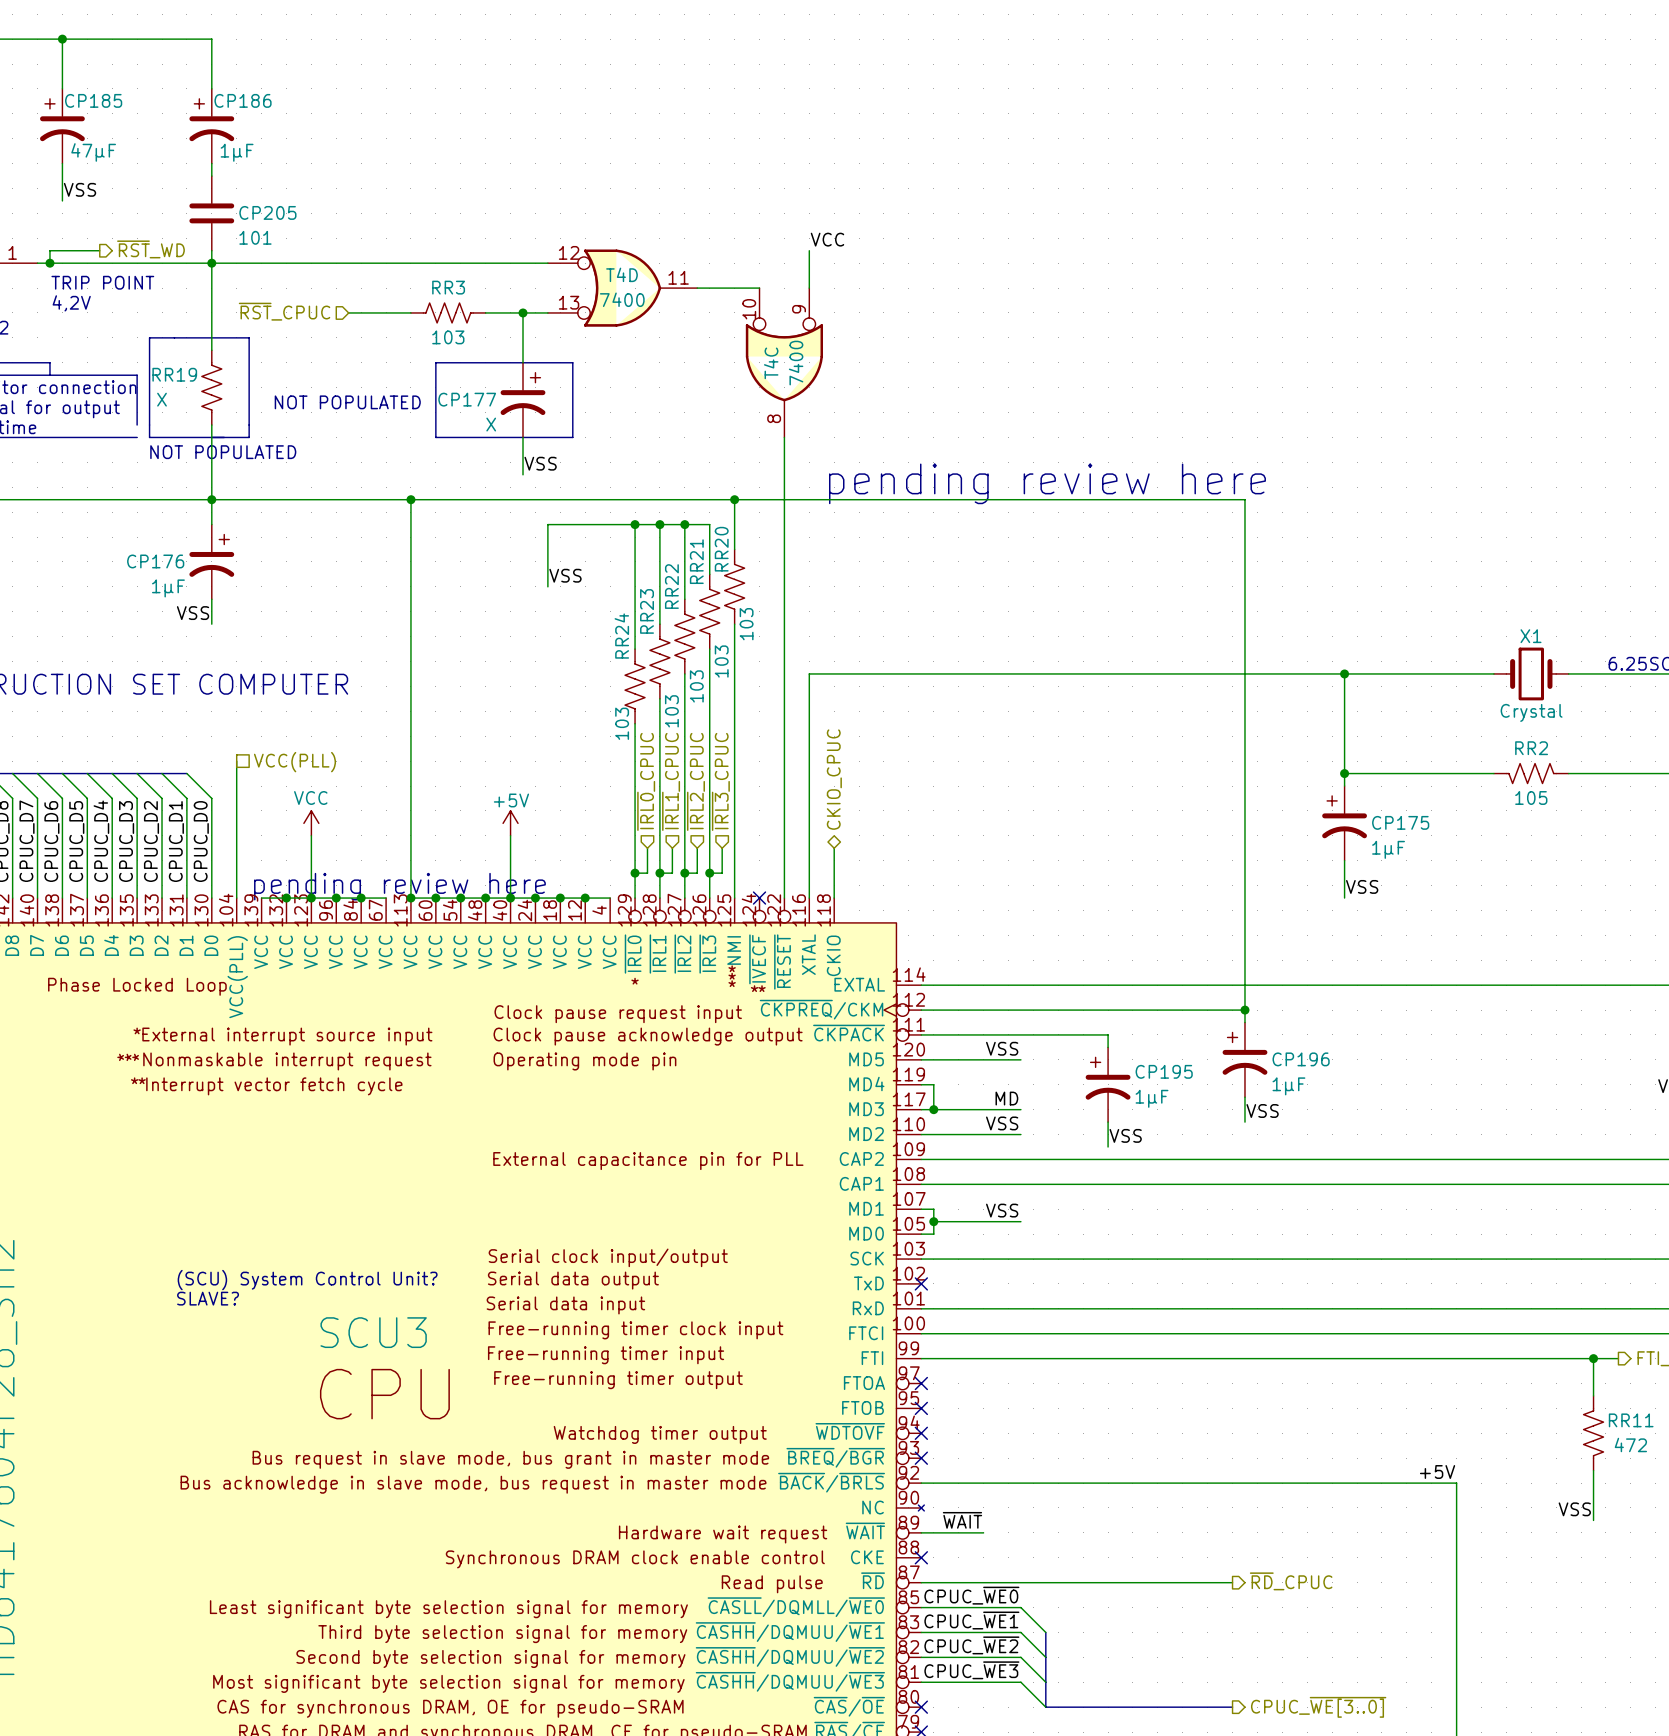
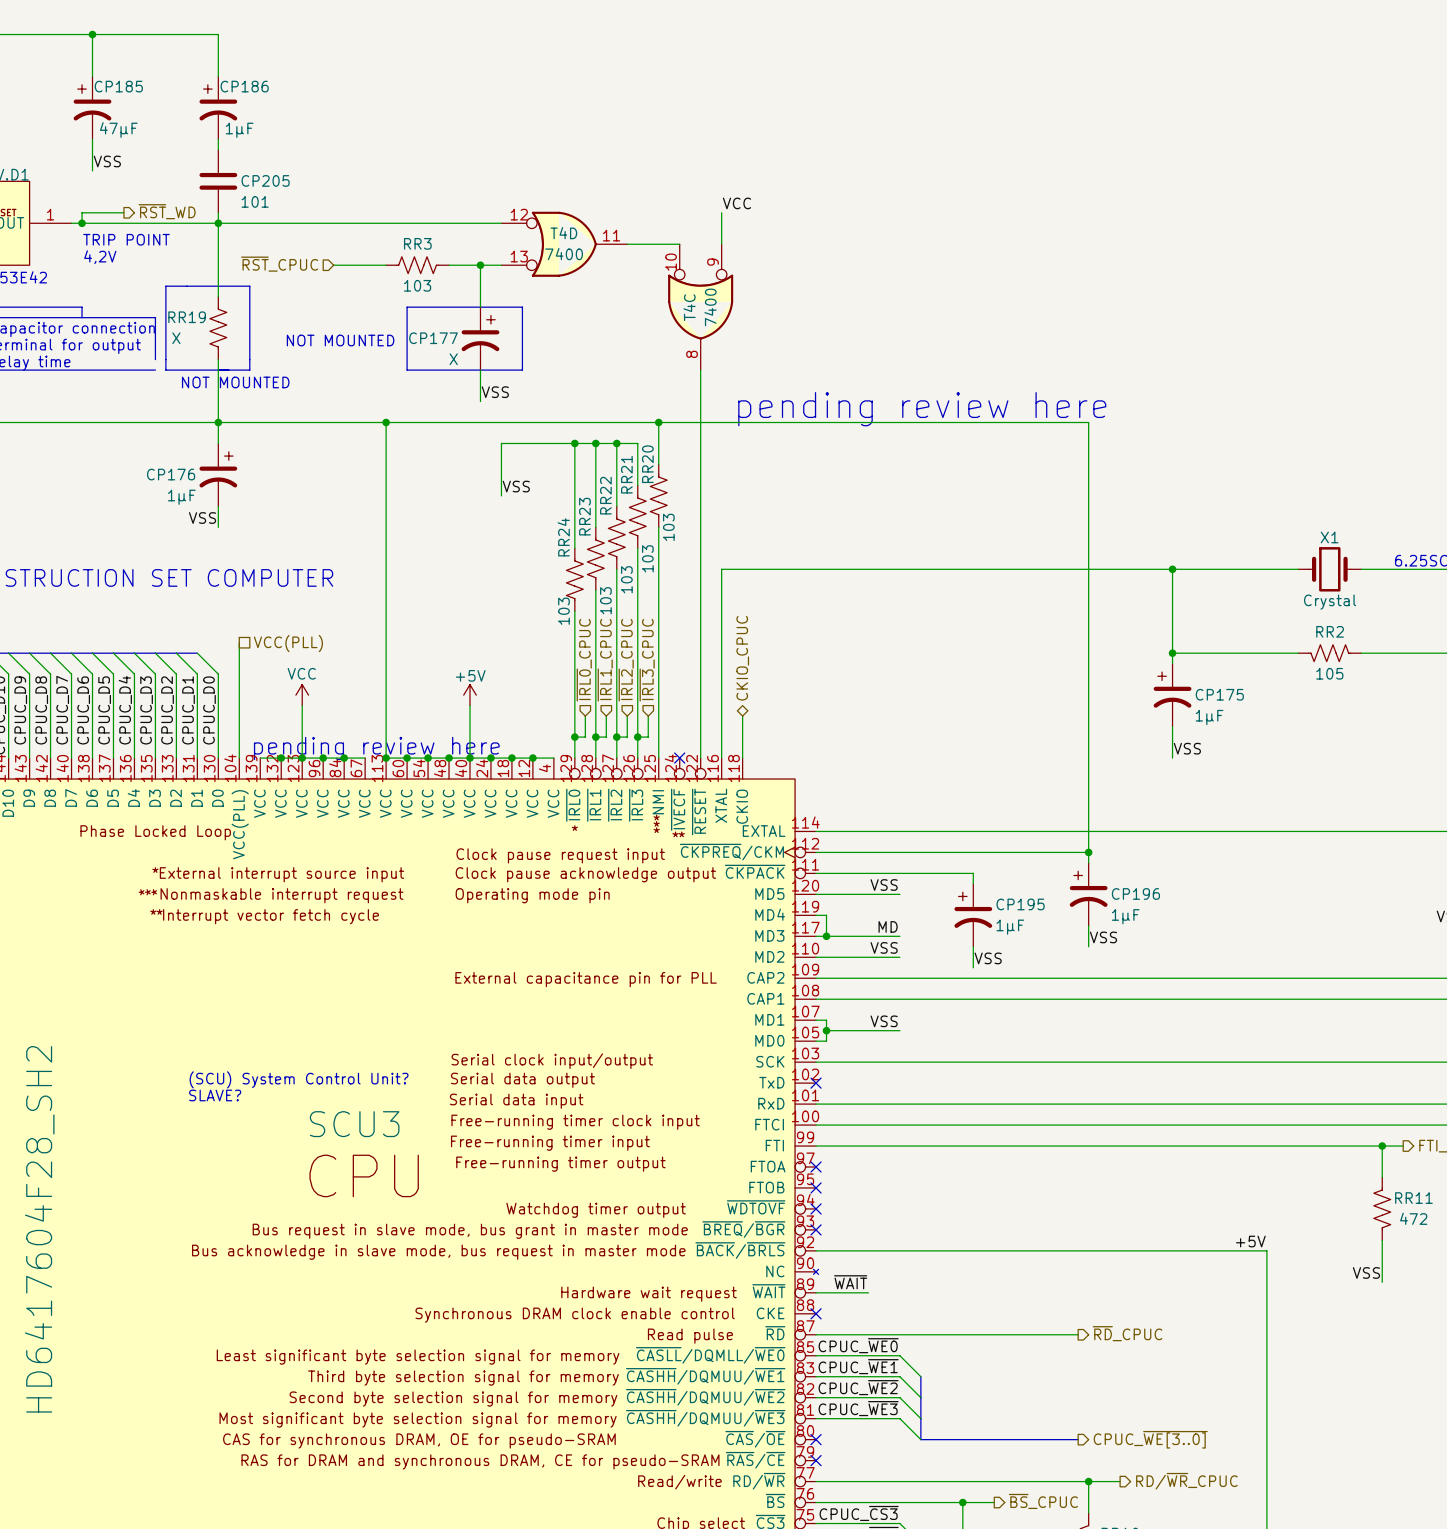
text: NOT POPULATED (347, 402) -> NOT MOUNTED (340, 340)
text: NOT POPULATED (223, 452) -> NOT MOUNTED (235, 382)

